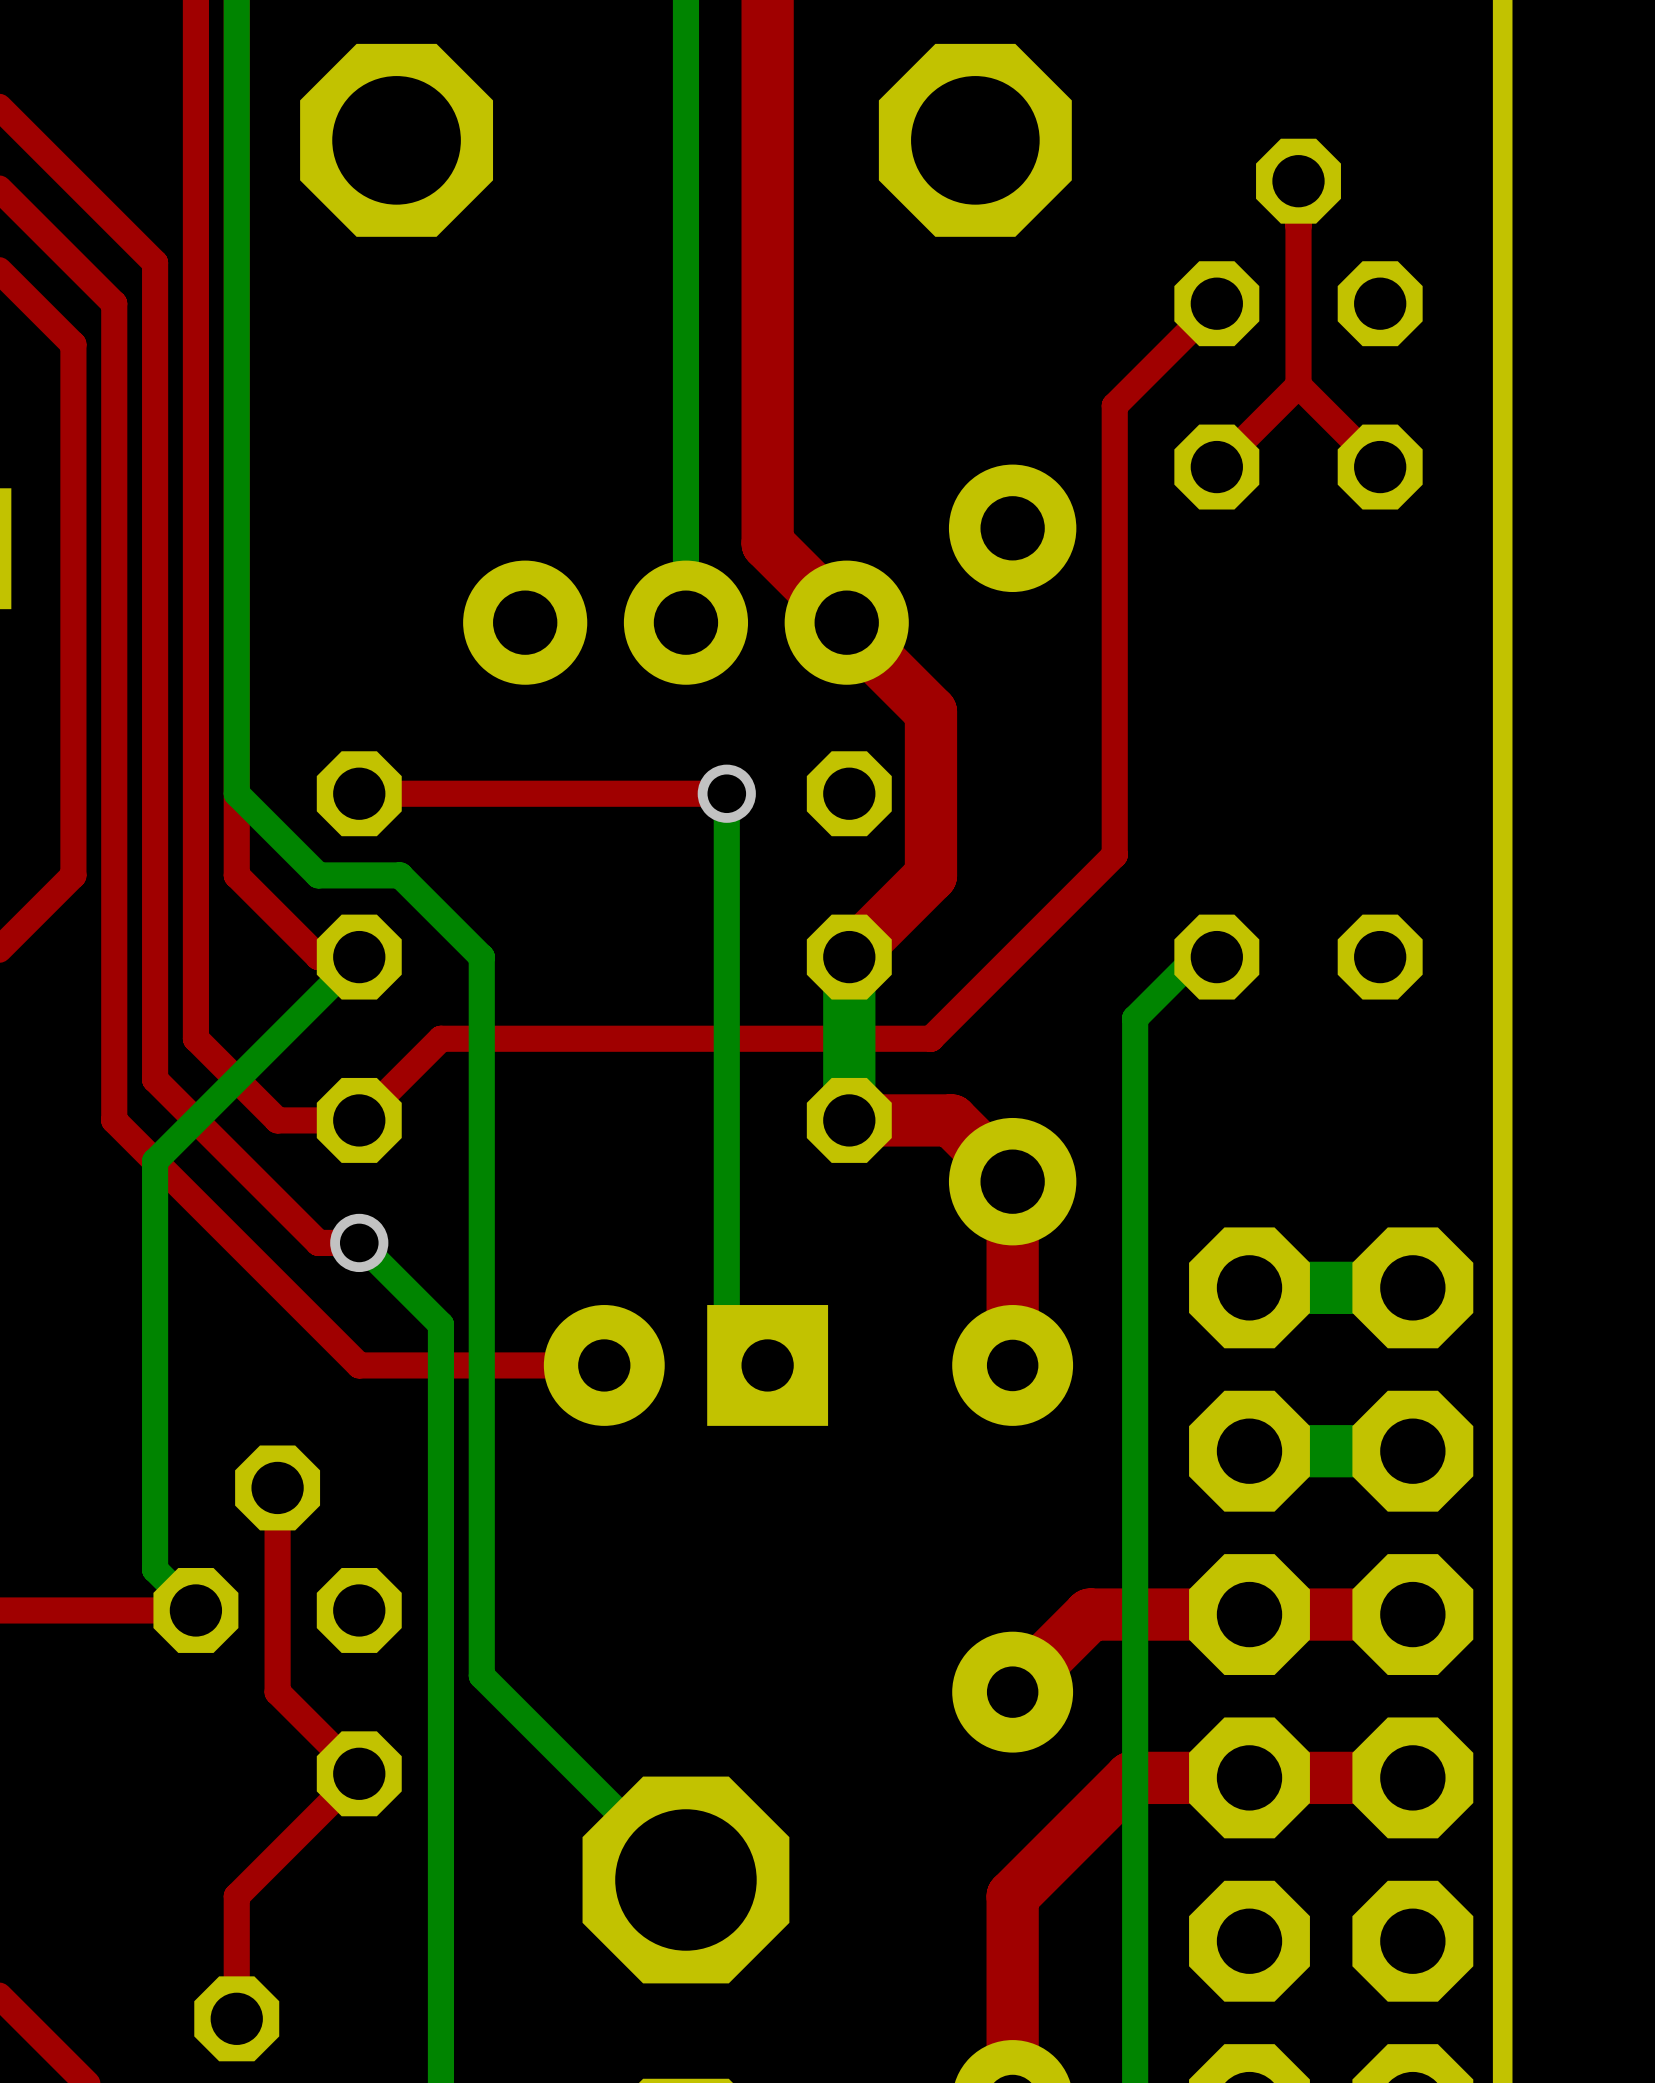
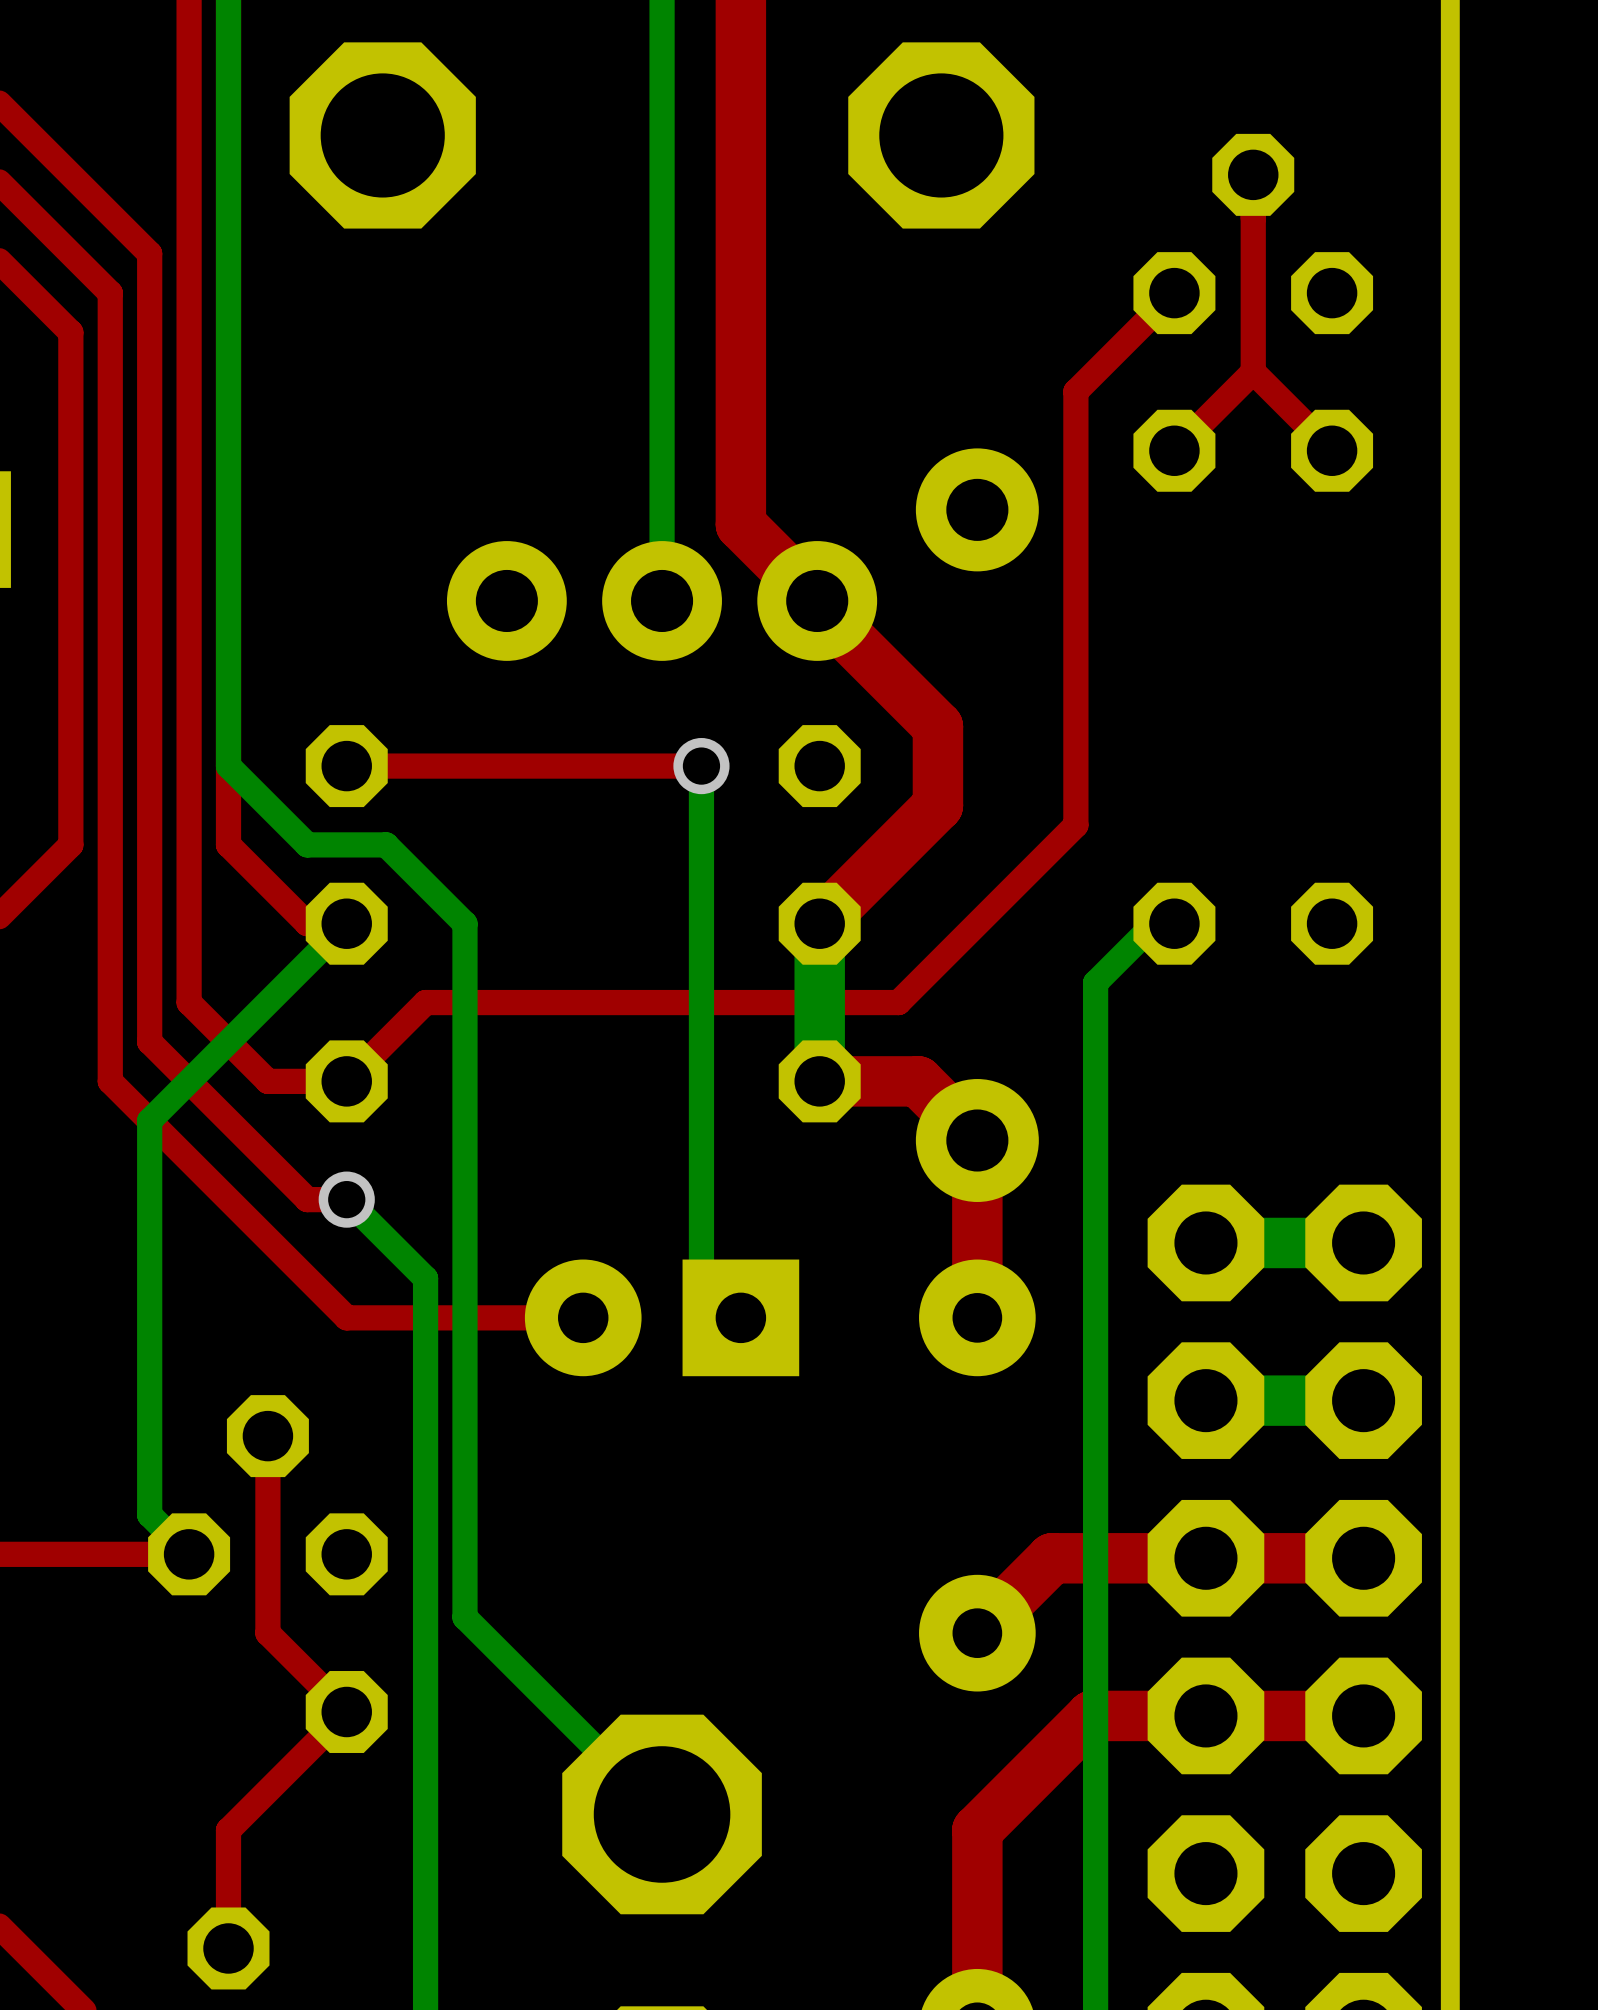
top track: (930, 712) (930, 875) -> (898, 687) (937, 726) (937, 805) (898, 844)

